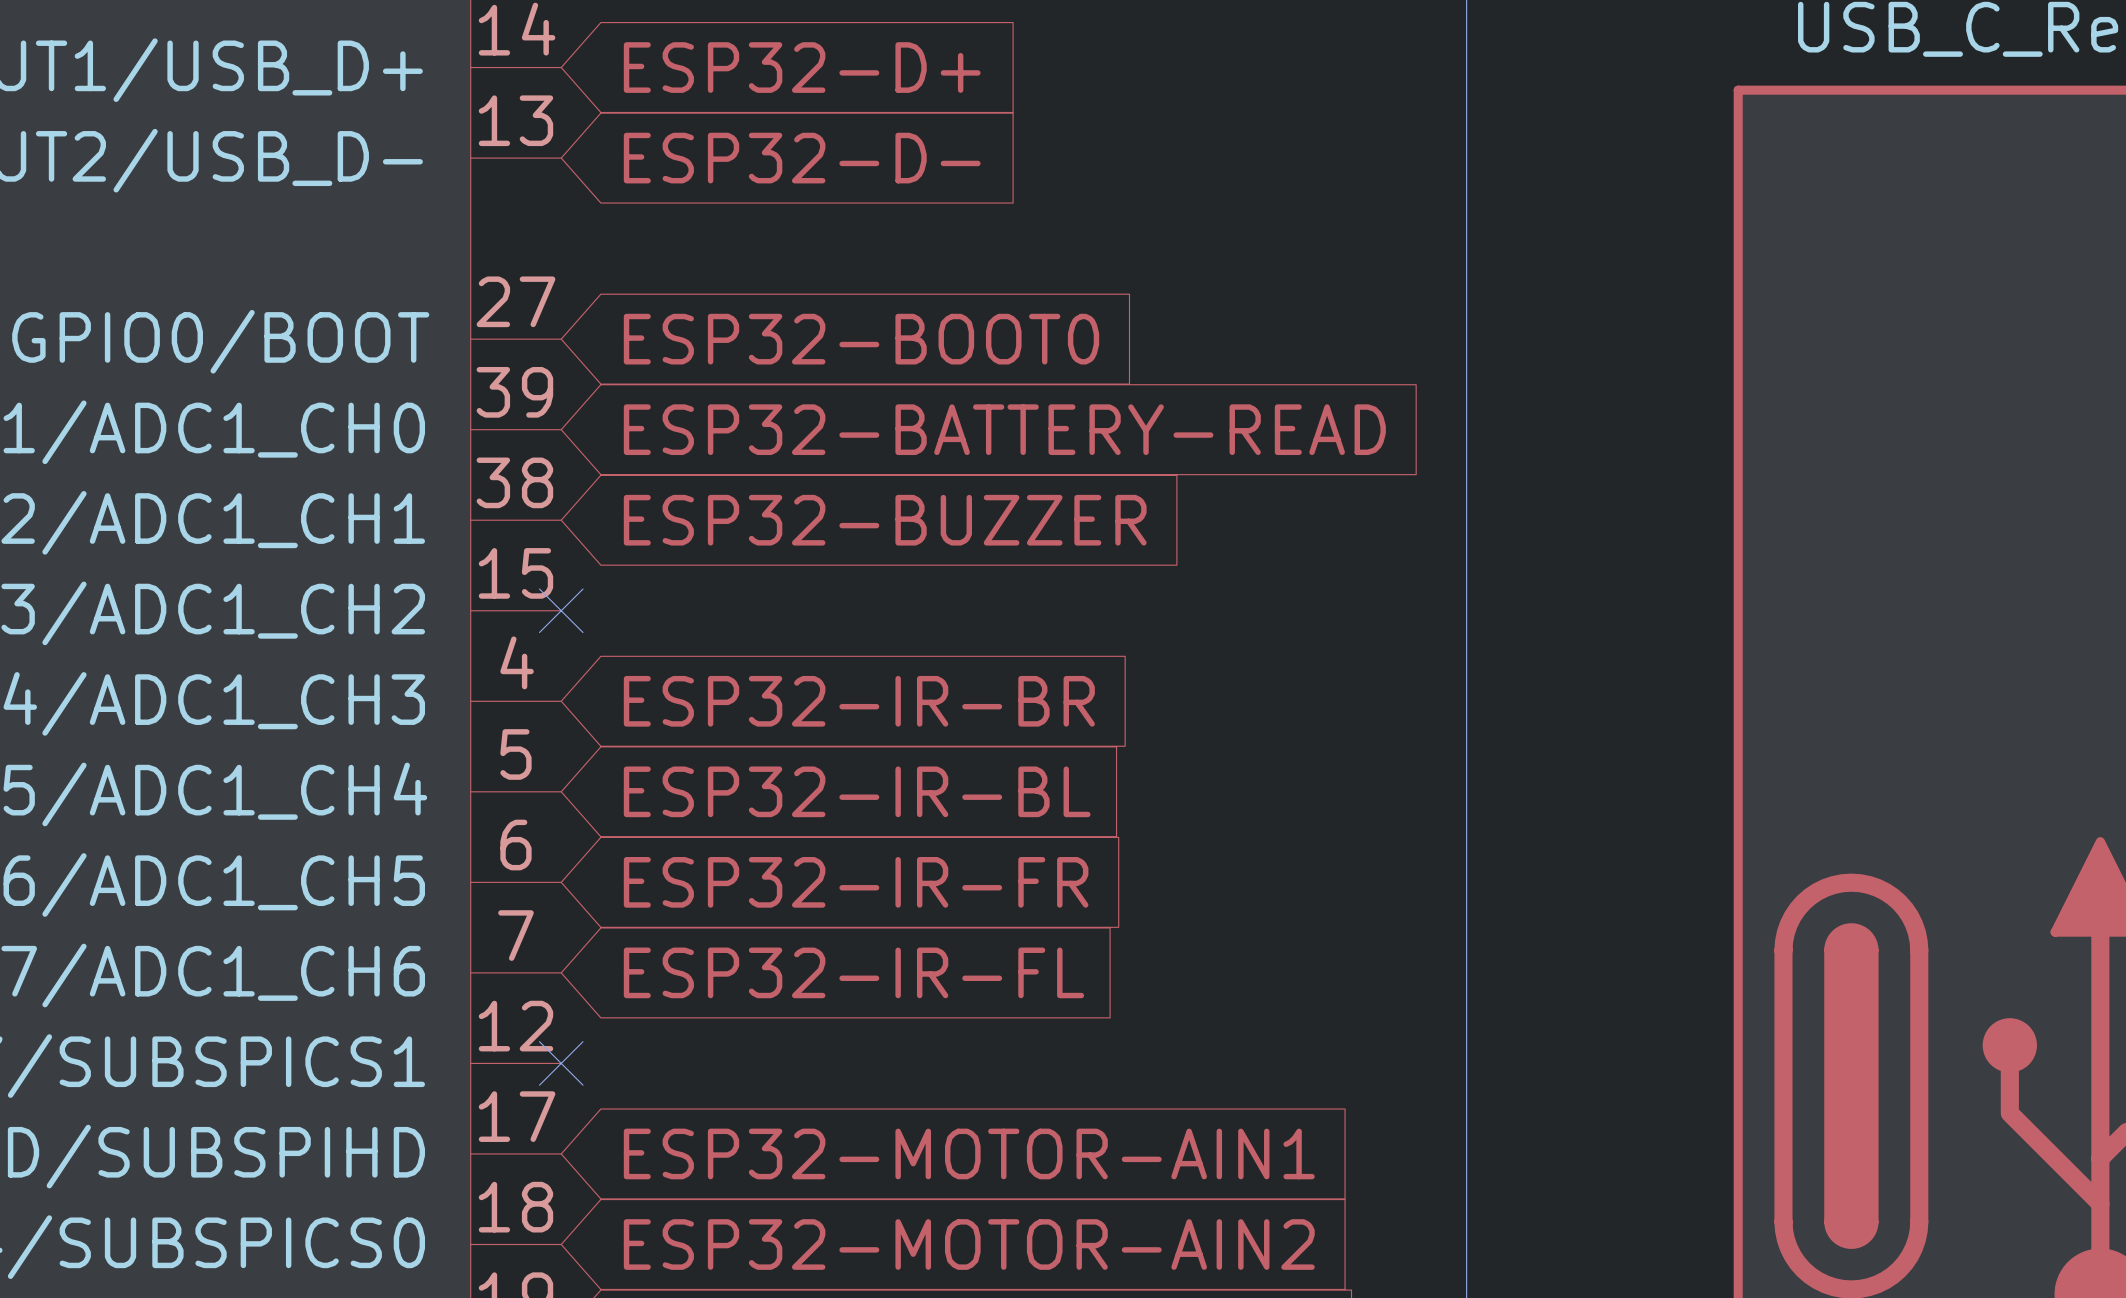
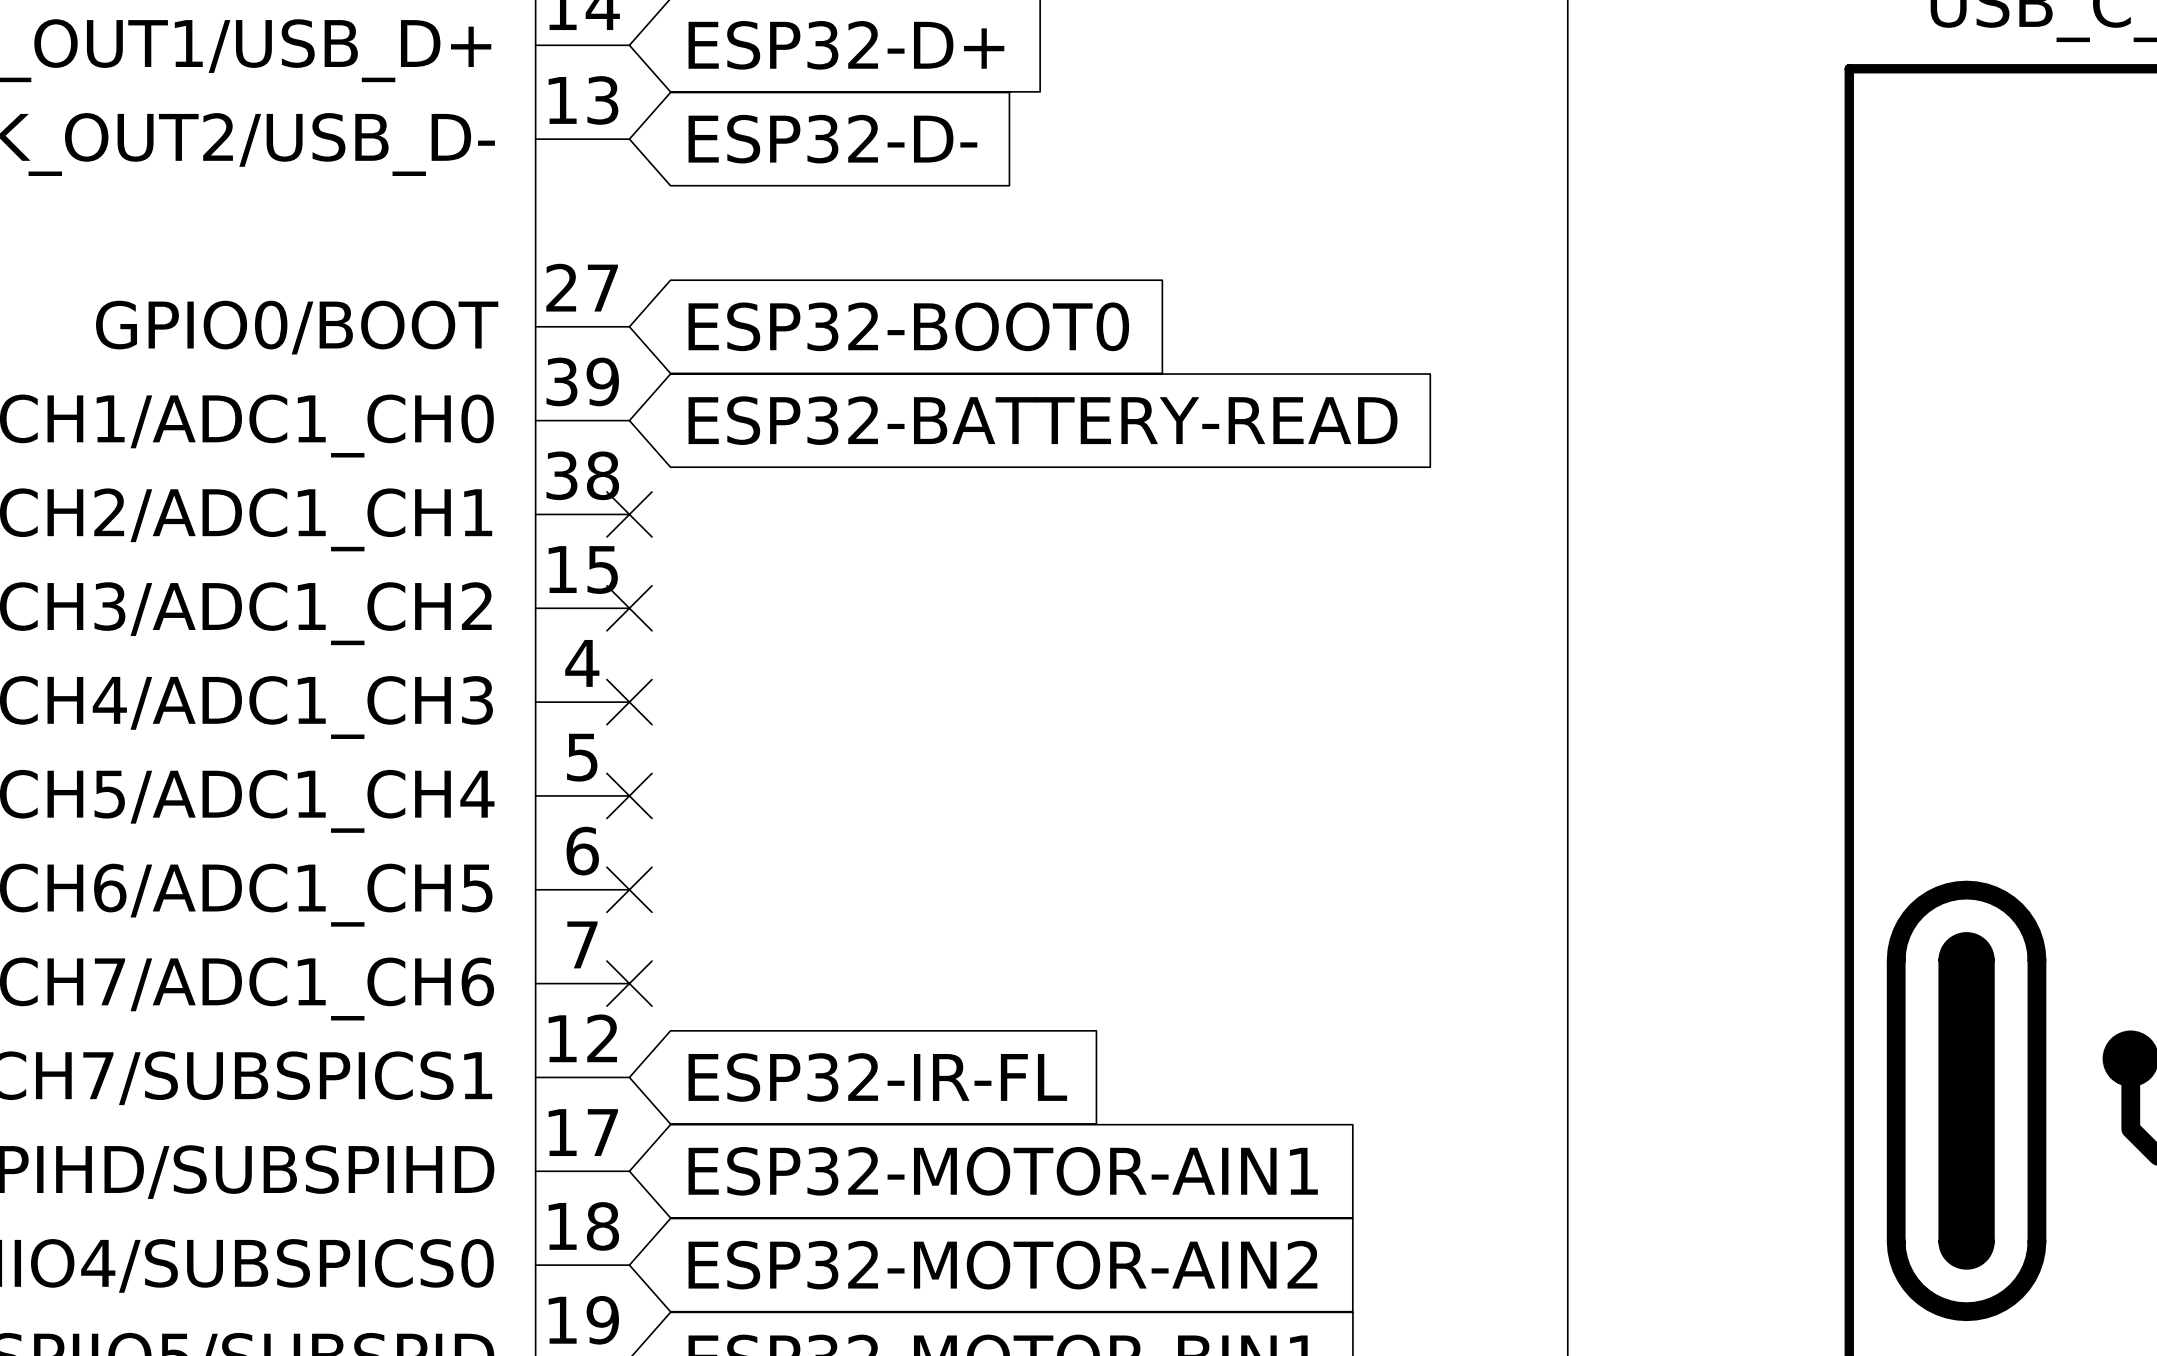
no-connect mark: none -> (629, 514)
global label: ESP32-BUZZER (885, 520) -> none
no-connect mark: none -> (629, 702)
global label: ESP32-IR-BR (859, 701) -> none
no-connect mark: none -> (629, 795)
global label: ESP32-IR-BL (857, 791) -> none
no-connect mark: none -> (629, 889)
global label: ESP32-IR-FR (856, 882) -> none
no-connect mark: none -> (629, 983)
global label position: ESP32-IR-FL (853, 972) -> ESP32-IR-FL (877, 1077)
no-connect mark: (561, 1063) -> none

